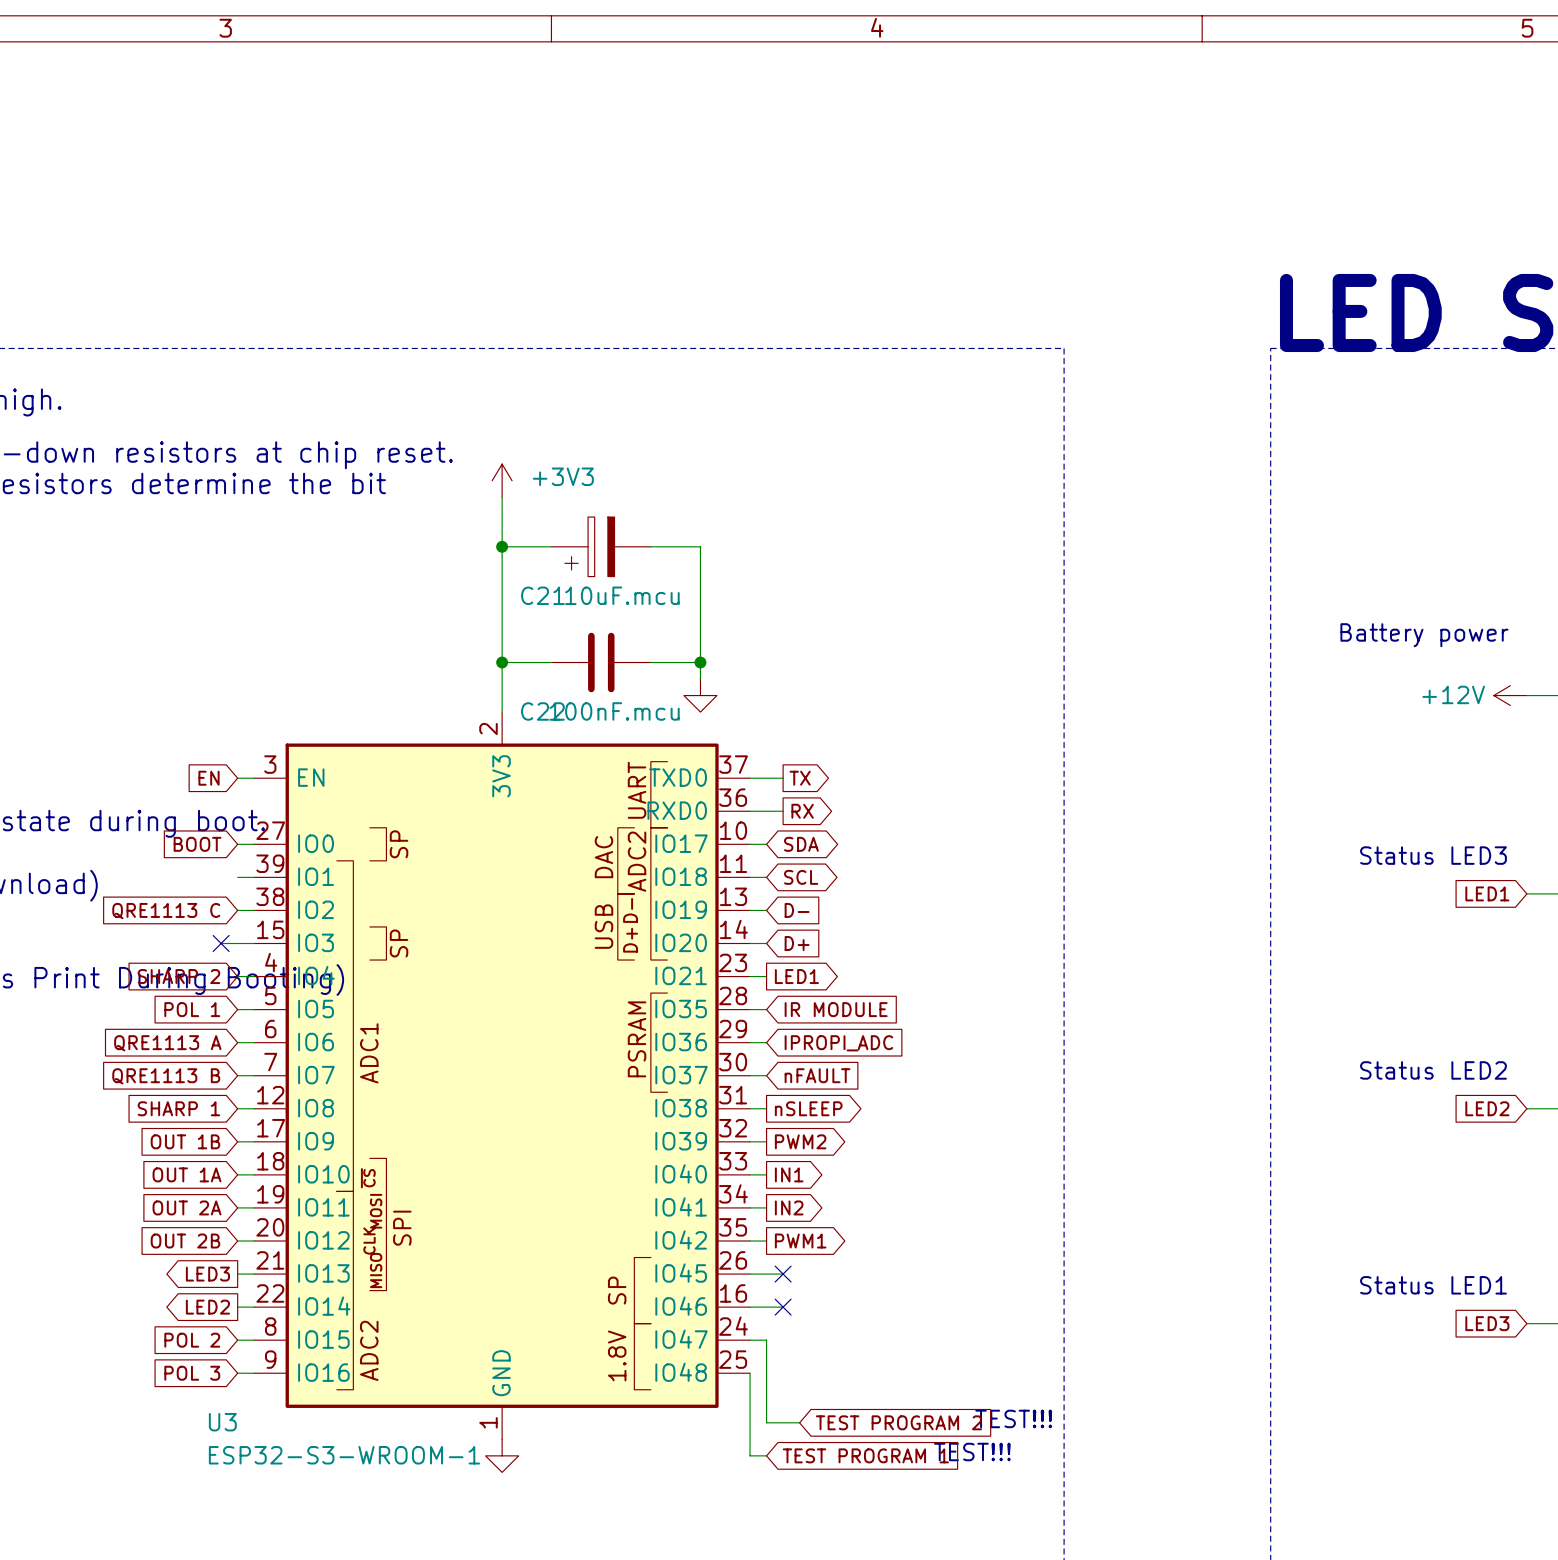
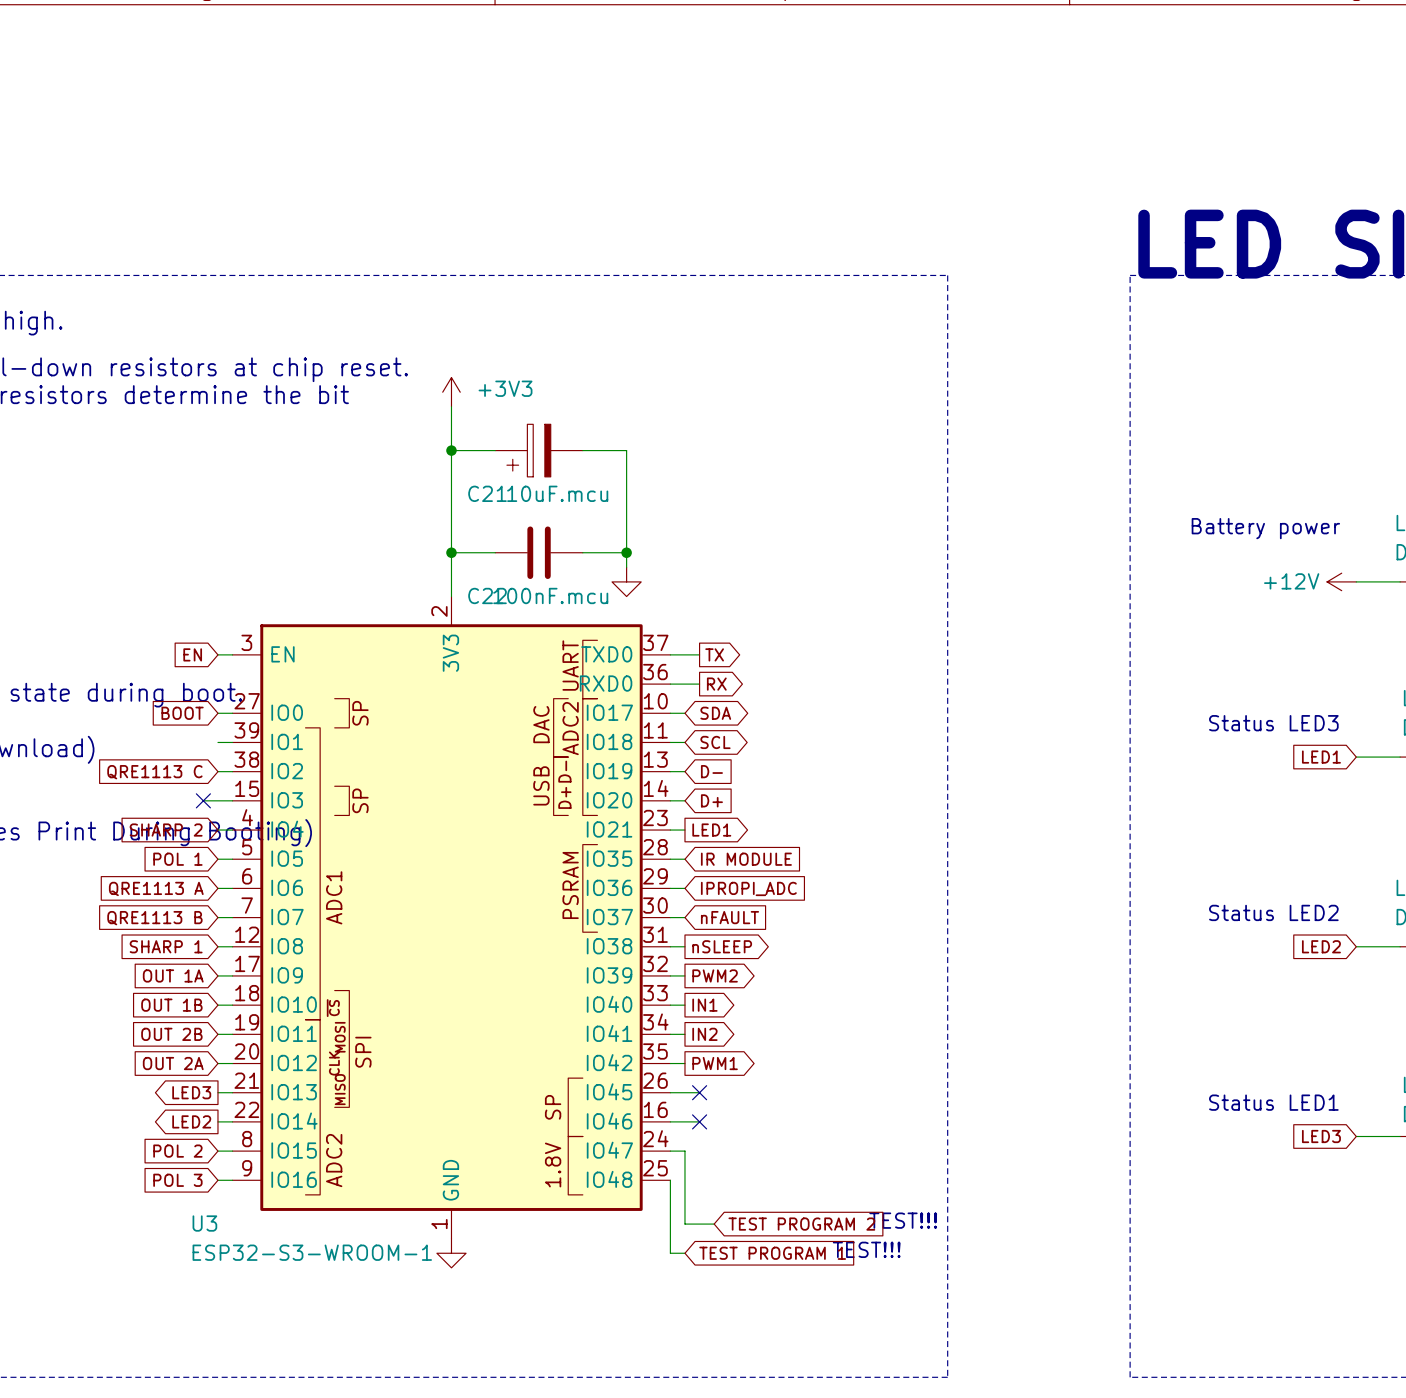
global label: OUT 1B (185, 1141) -> OUT 1A (173, 975)
global label: OUT 1A (187, 1174) -> OUT 1B (171, 1005)
global label: OUT 2A (187, 1207) -> OUT 2B (171, 1034)
global label: OUT 2B (185, 1241) -> OUT 2A (173, 1063)

